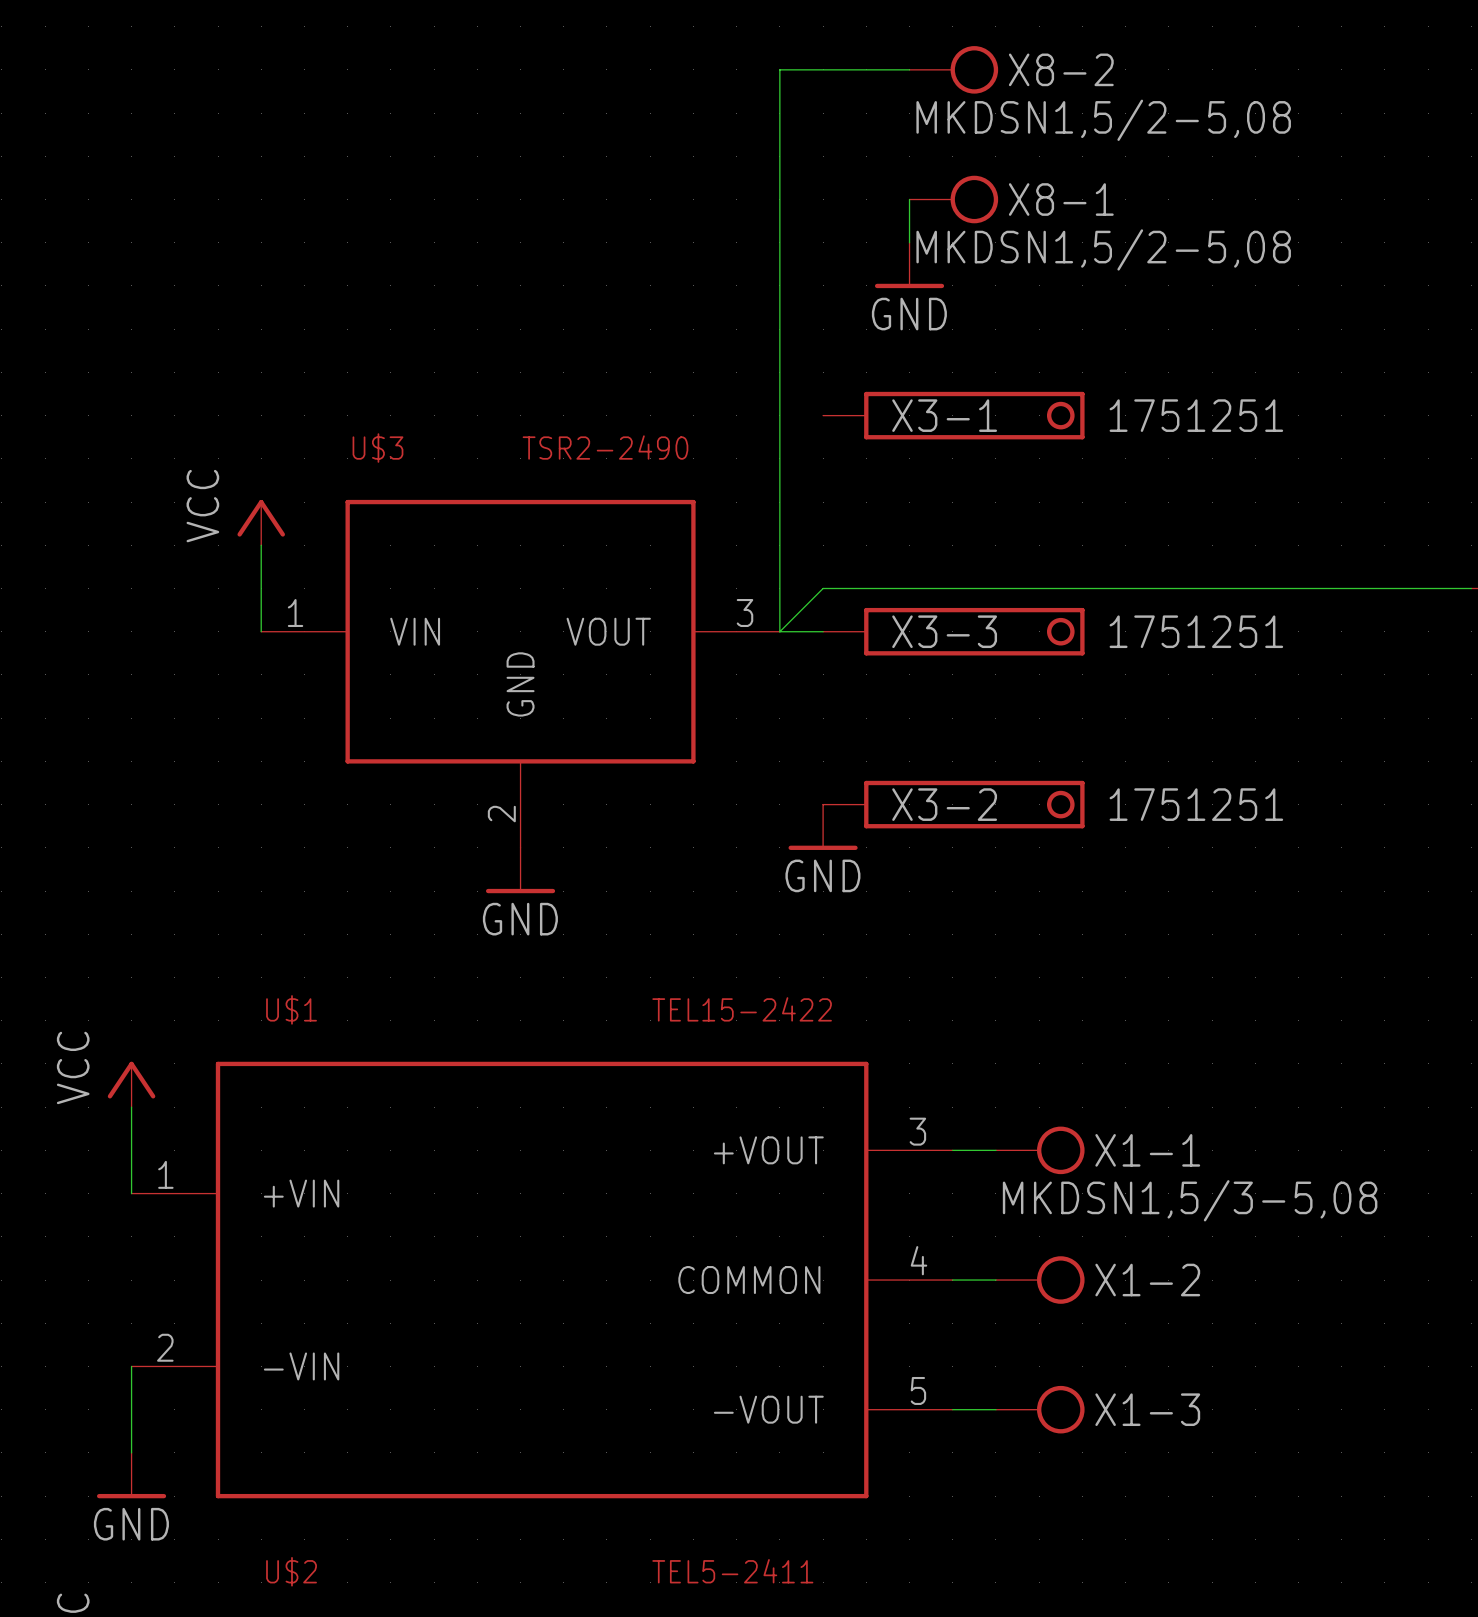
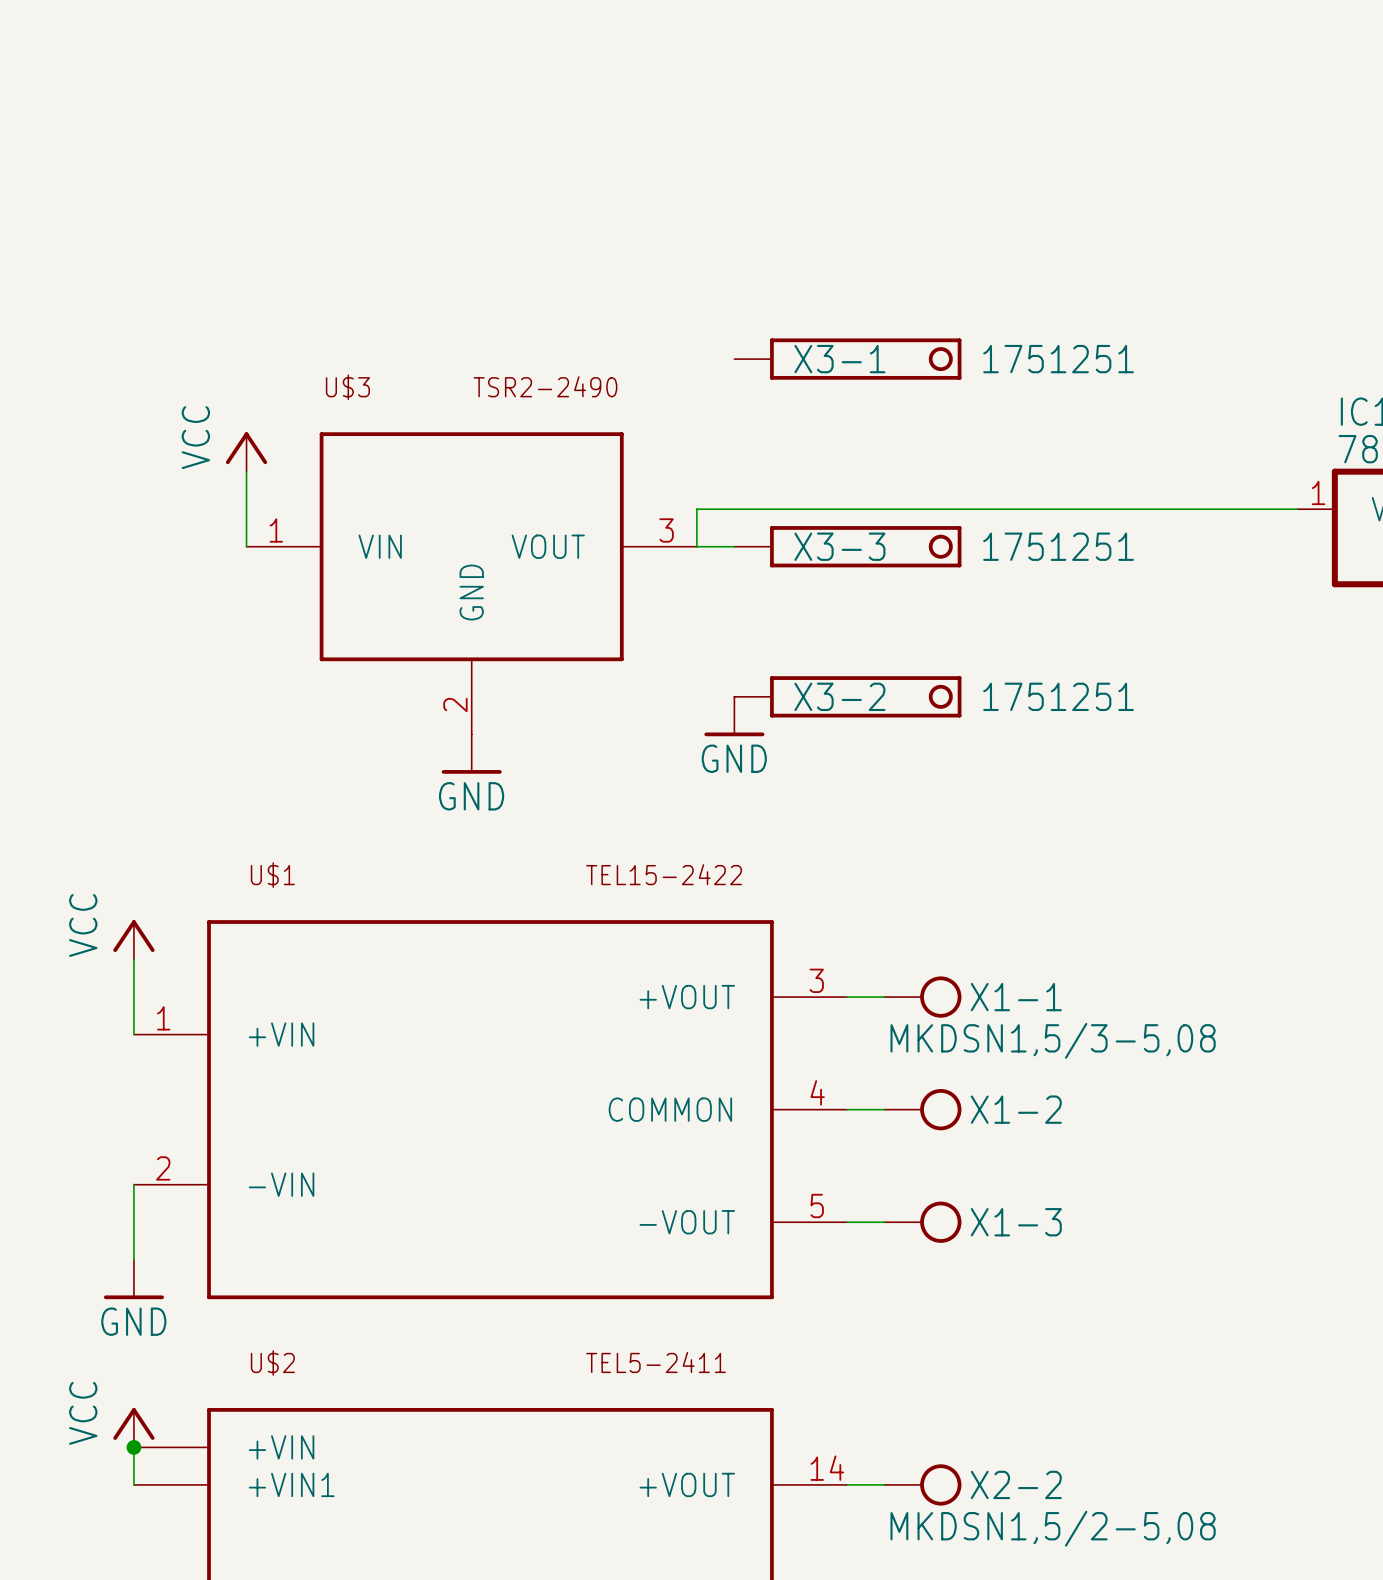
wire: (909, 69) (779, 69) (779, 588) -> none
X8-2: MKDSN1,5/2-5,08 (953, 69) -> none
wire: (909, 199) (909, 242) -> none
X8-1: MKDSN1,5/2-5,08 (953, 199) -> none
power symbol: GND (909, 265) -> none
wire: (823, 588) (779, 631) -> (734, 509) (696, 509)

